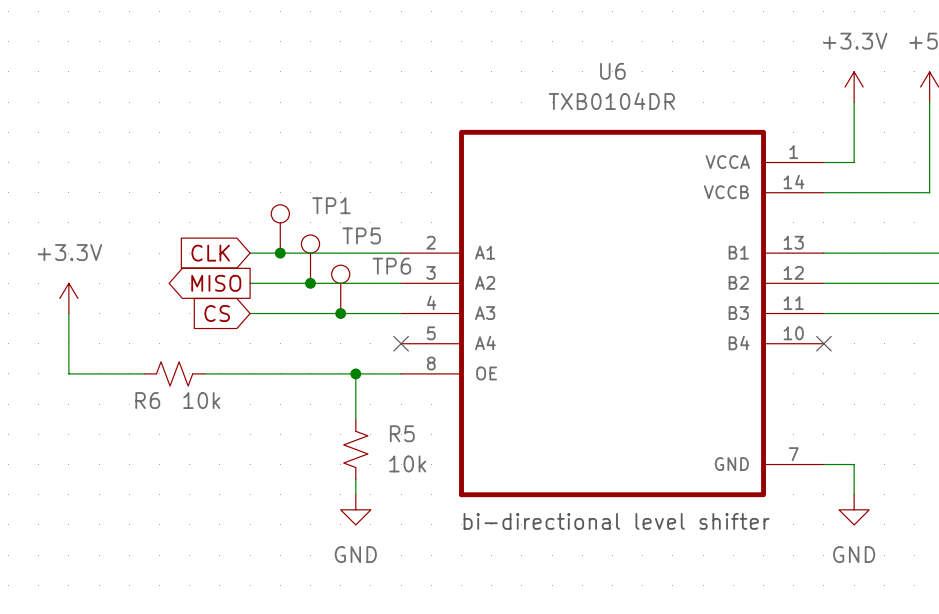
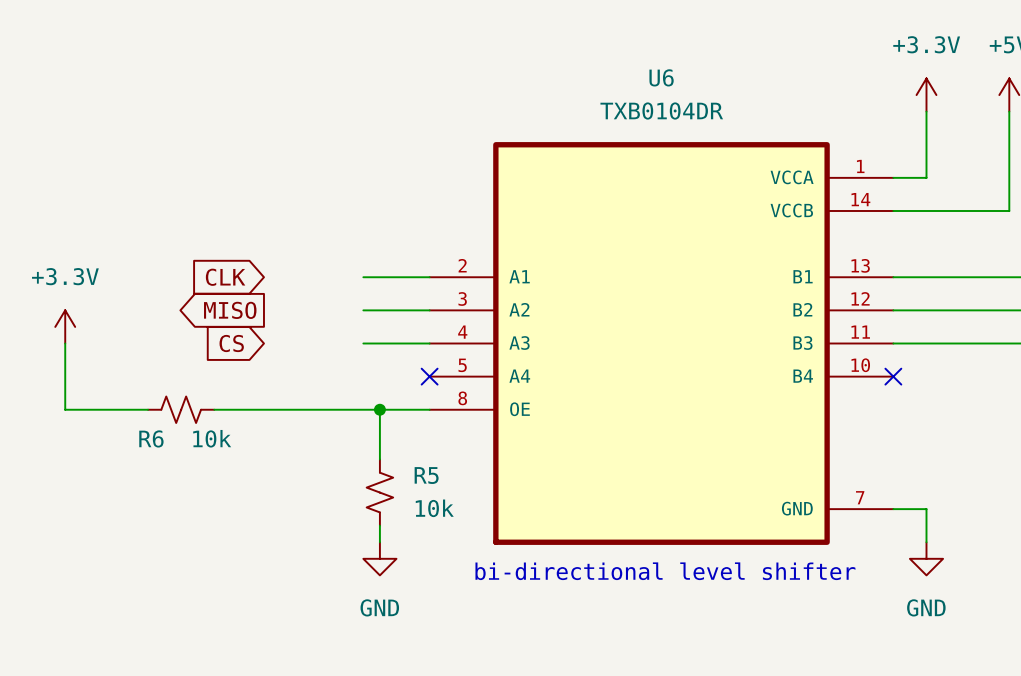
TP1: (280, 228) -> none
wire: (250, 253) (340, 253) -> none
junction: (280, 253) -> none
TP5: (310, 259) -> none
wire: (250, 283) (340, 283) -> none
junction: (310, 283) -> none
TP6: (340, 289) -> none
wire: (250, 313) (340, 313) -> none
junction: (340, 313) -> none

